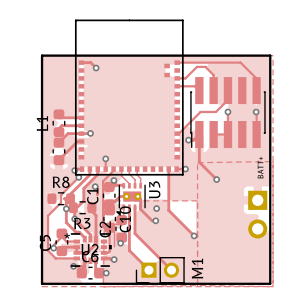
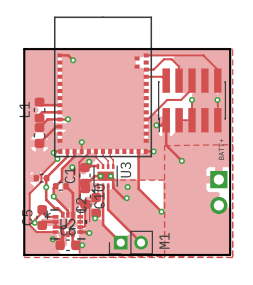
R8: (61, 198) -> none
part: none -> (41, 178)
R3: (82, 207) -> none
part: none -> (60, 186)

